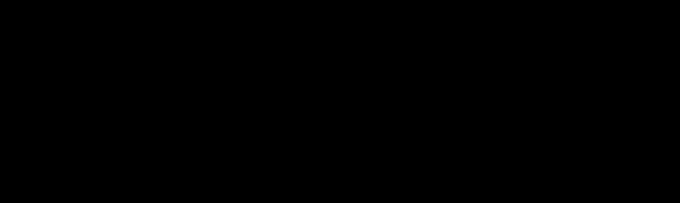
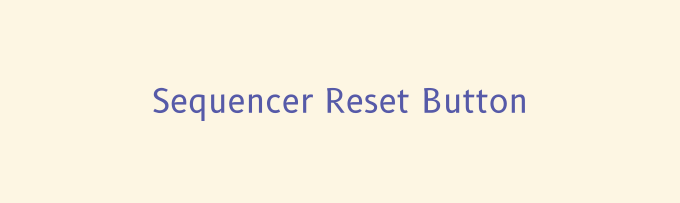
text: none -> Sequencer Reset Button (339, 104)

